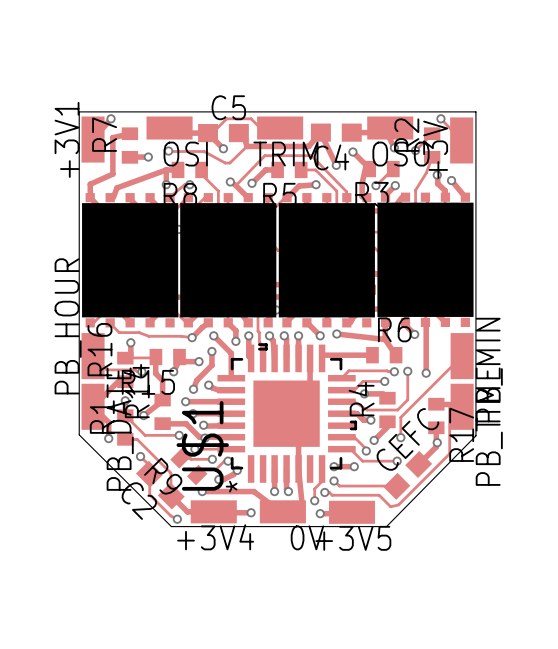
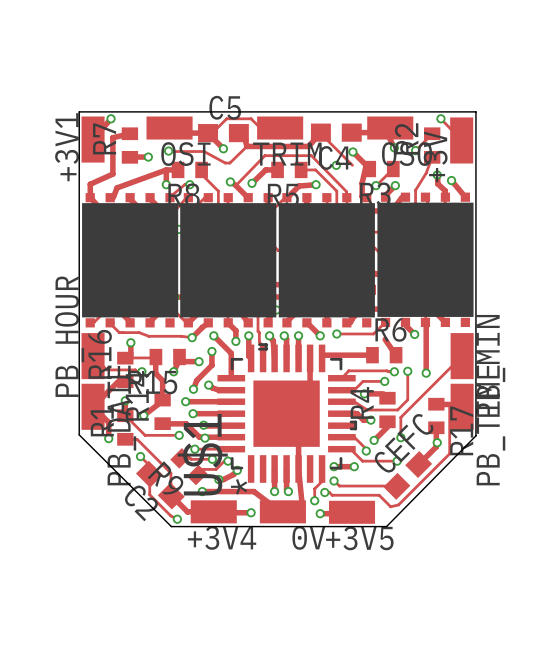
track: (321, 134) (336, 165) -> (321, 134) (352, 165)
track: (385, 322) (385, 339) (336, 333) -> (385, 322) (373, 333) (336, 333)

